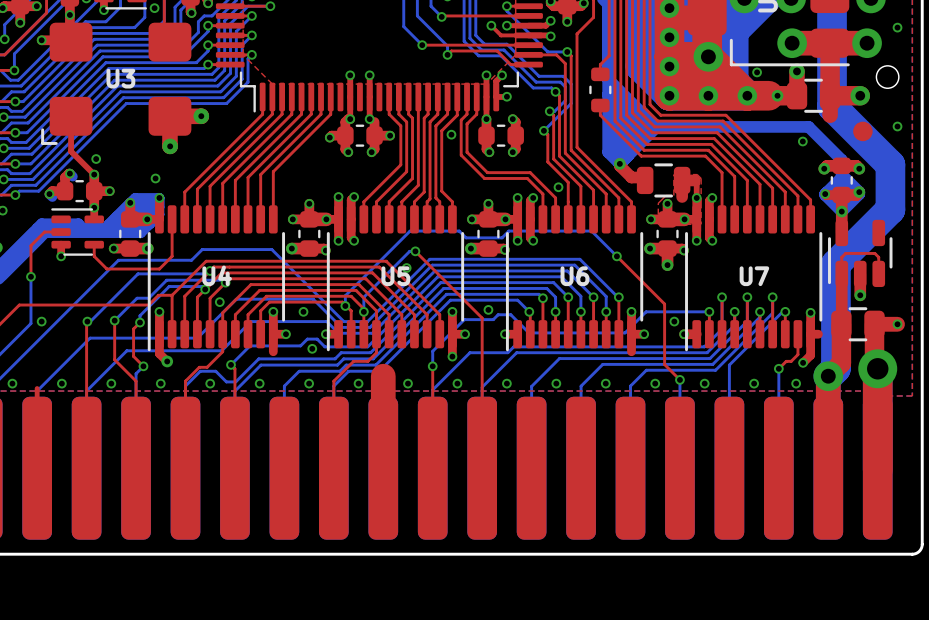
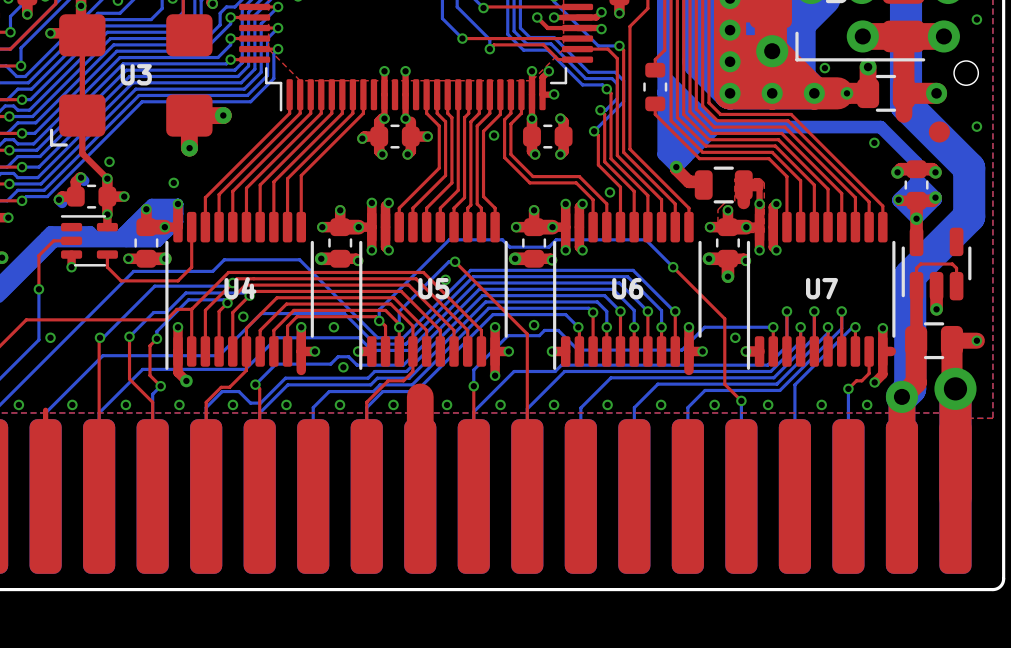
top track: none -> (82, 35) (82, 115)

